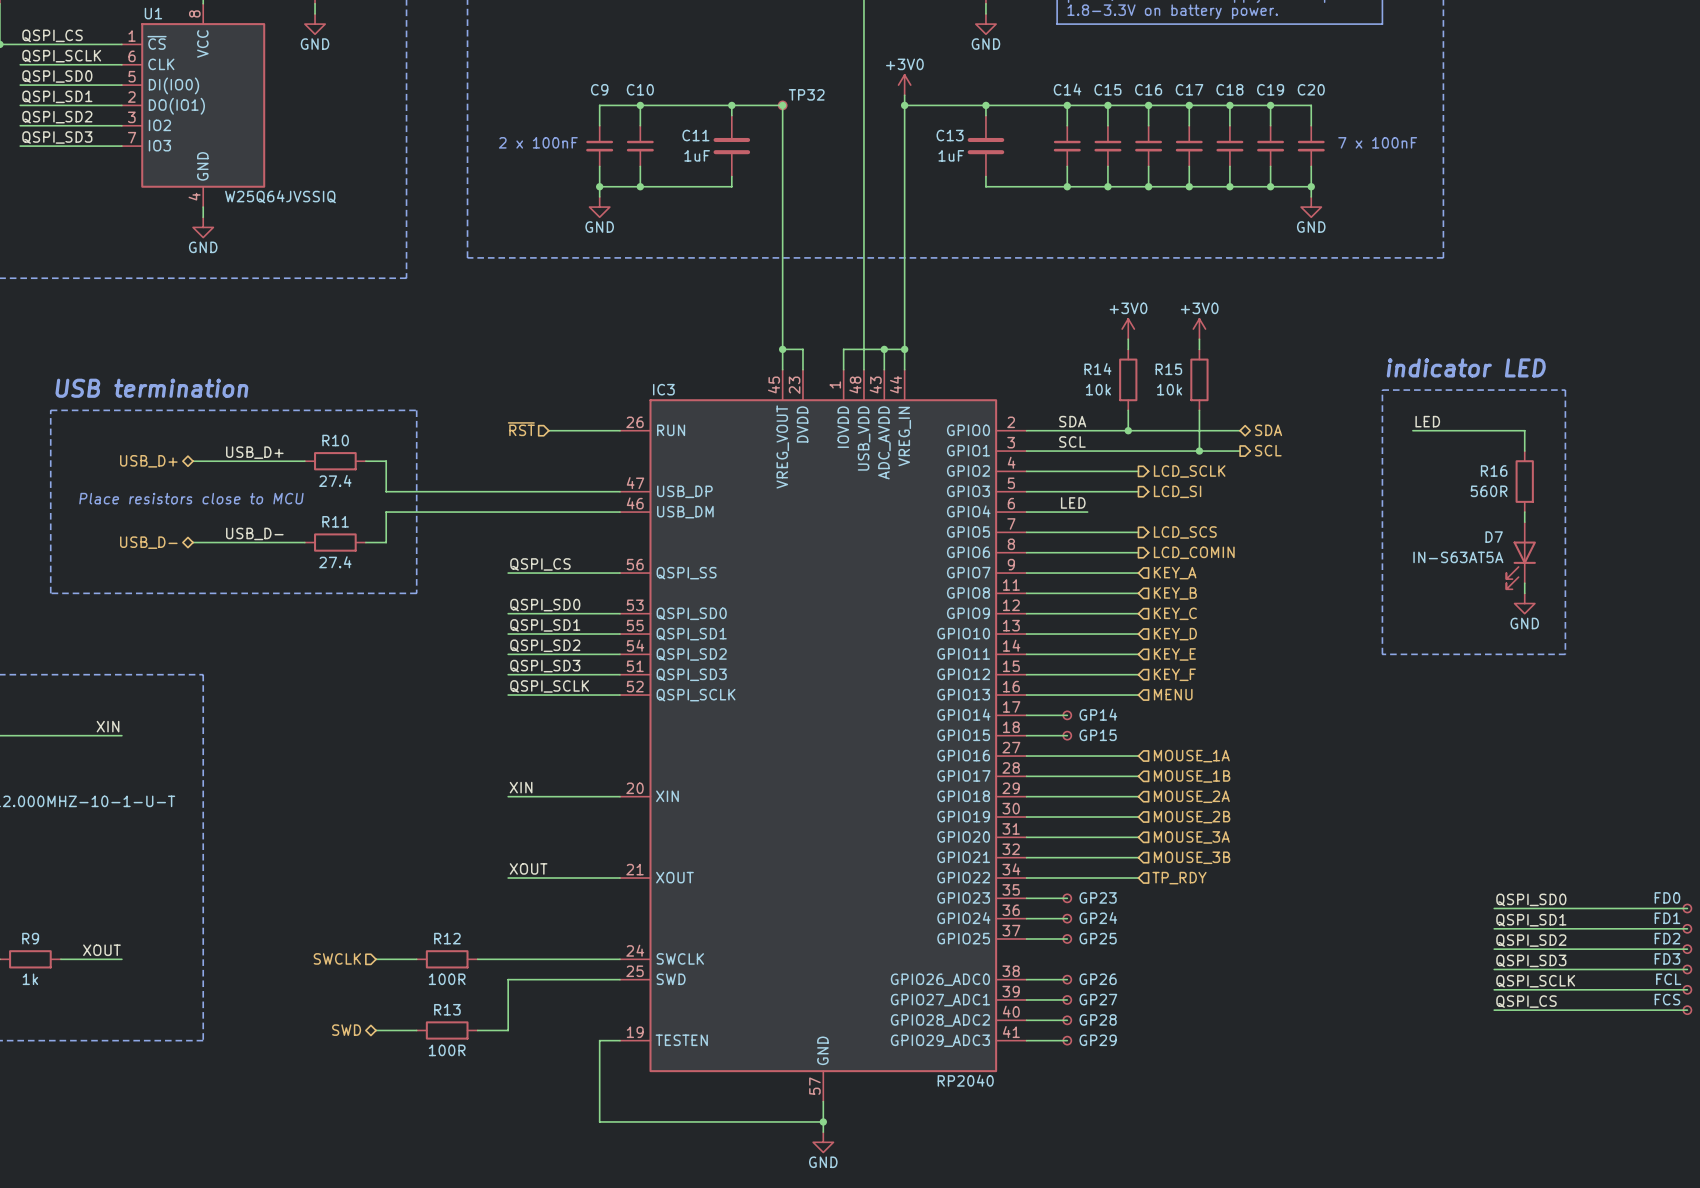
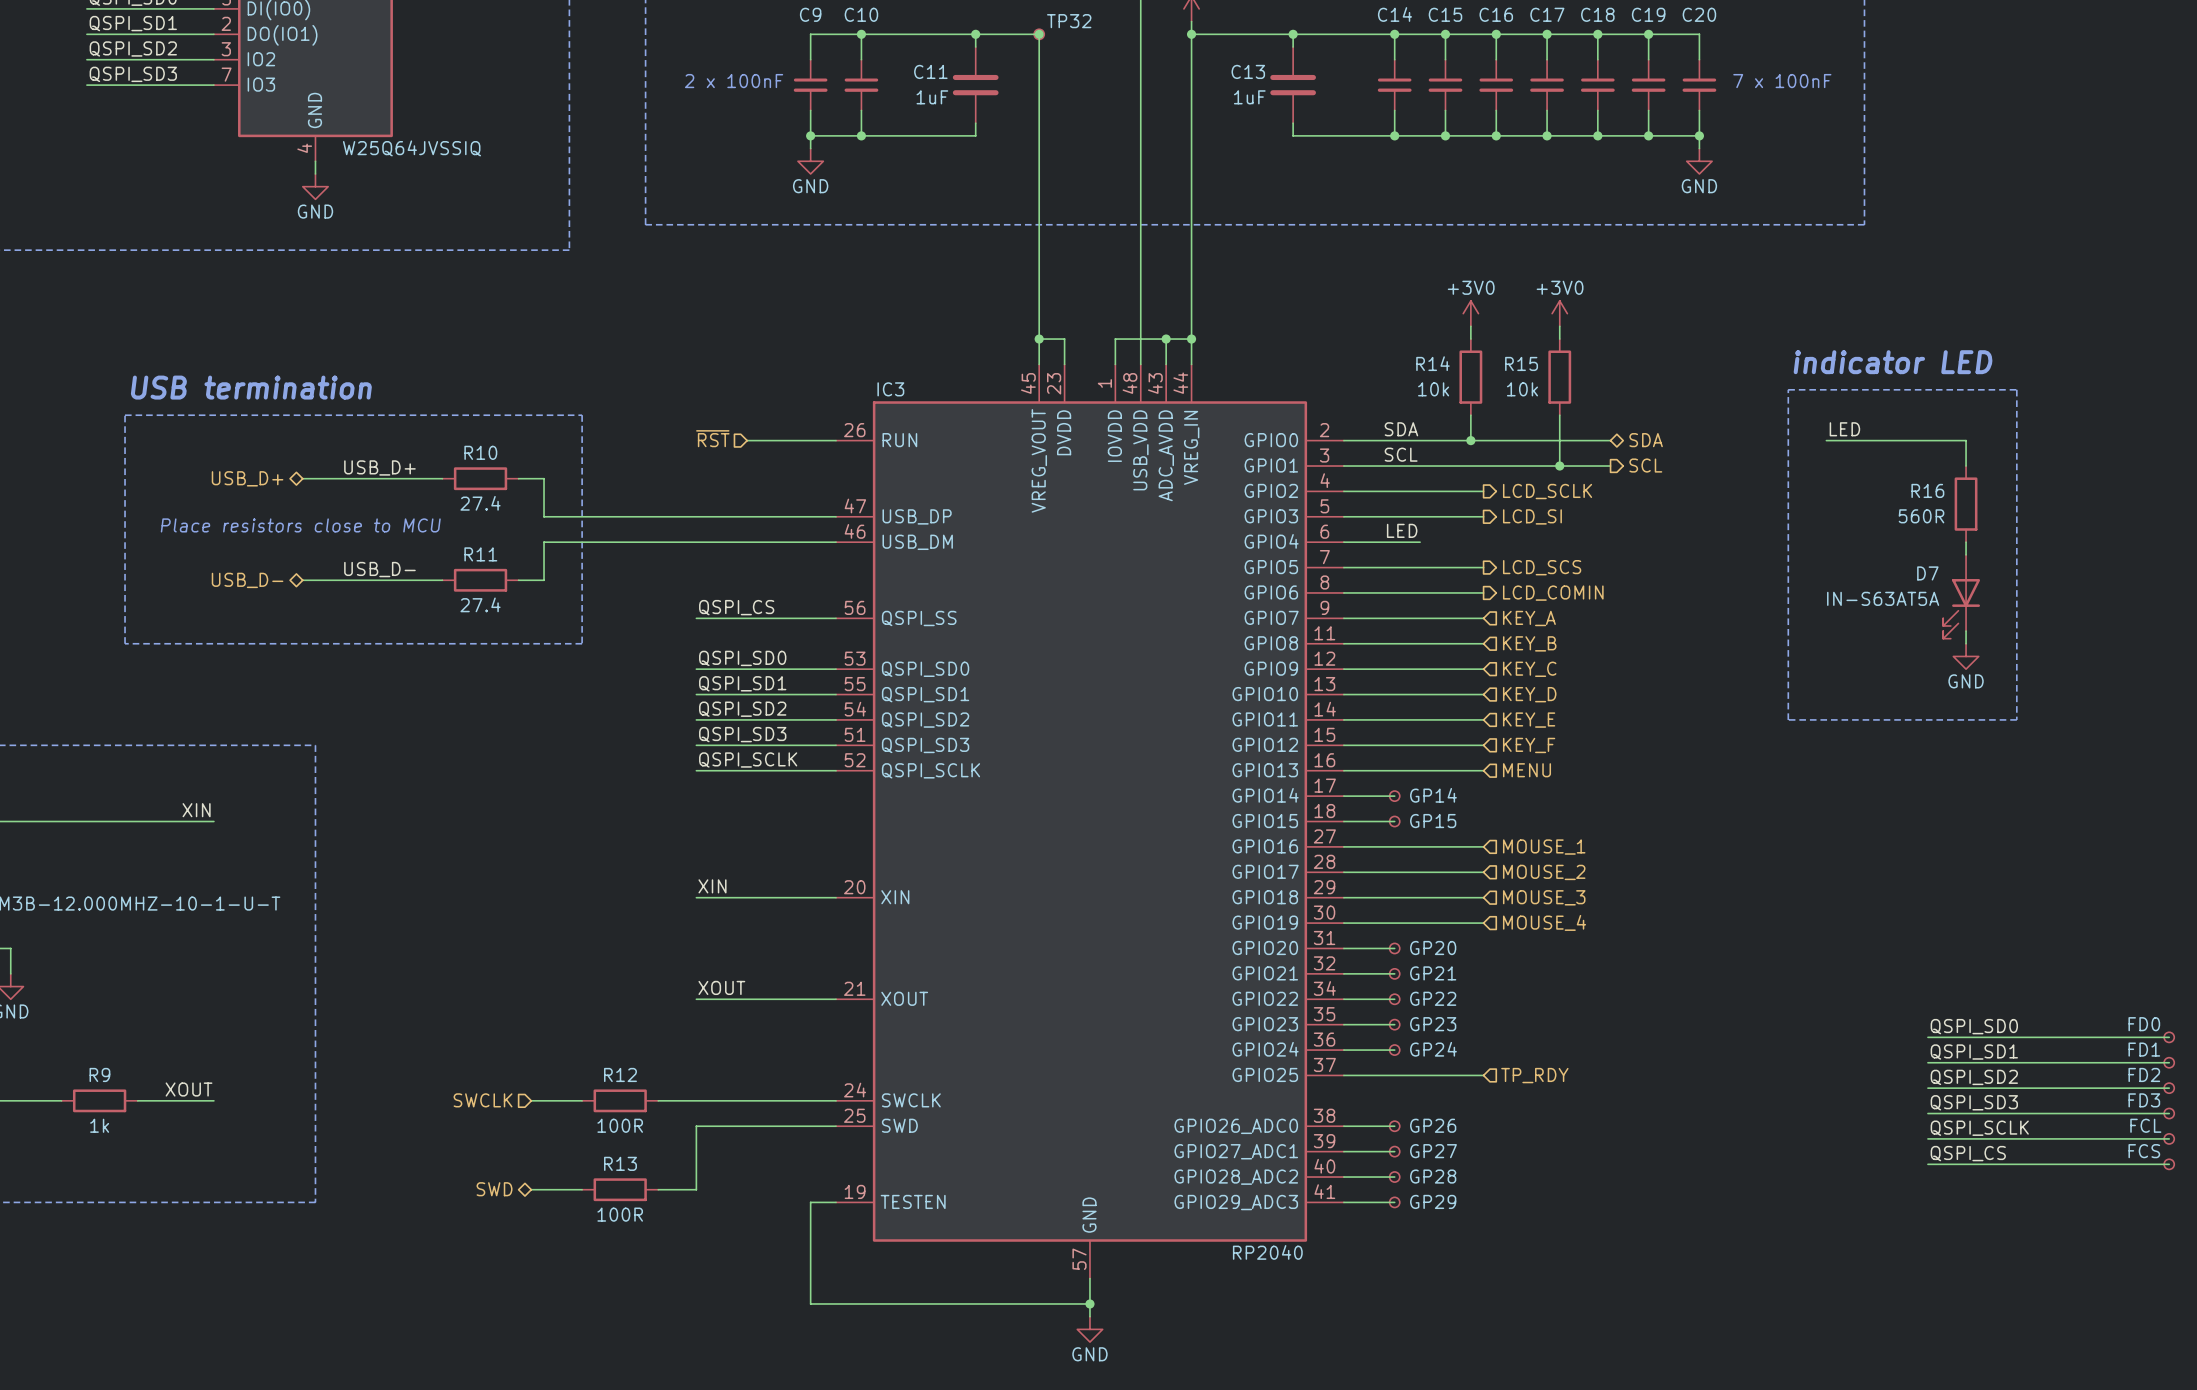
hierarchical label: MOUSE_1A (1191, 756) -> MOUSE_1 (1544, 847)
hierarchical label: MOUSE_1B (1192, 776) -> MOUSE_2 (1544, 872)
hierarchical label: MOUSE_2A (1191, 796) -> MOUSE_3 (1544, 897)
hierarchical label: MOUSE_2B (1192, 817) -> MOUSE_4 (1544, 922)
wire: (1067, 837) (1138, 837) -> none
part: none -> GP20 (1394, 948)
hierarchical label: MOUSE_3A (1191, 837) -> none
wire: (1067, 857) (1138, 857) -> none
part: none -> GP21 (1394, 973)
hierarchical label: MOUSE_3B (1192, 857) -> none
wire: (1067, 878) (1138, 878) -> (1394, 1075) (1483, 1075)
part: none -> GP22 (1394, 999)
hierarchical label position: TP_RDY (1179, 878) -> TP_RDY (1534, 1075)
part: GP25 (1067, 938) -> none

